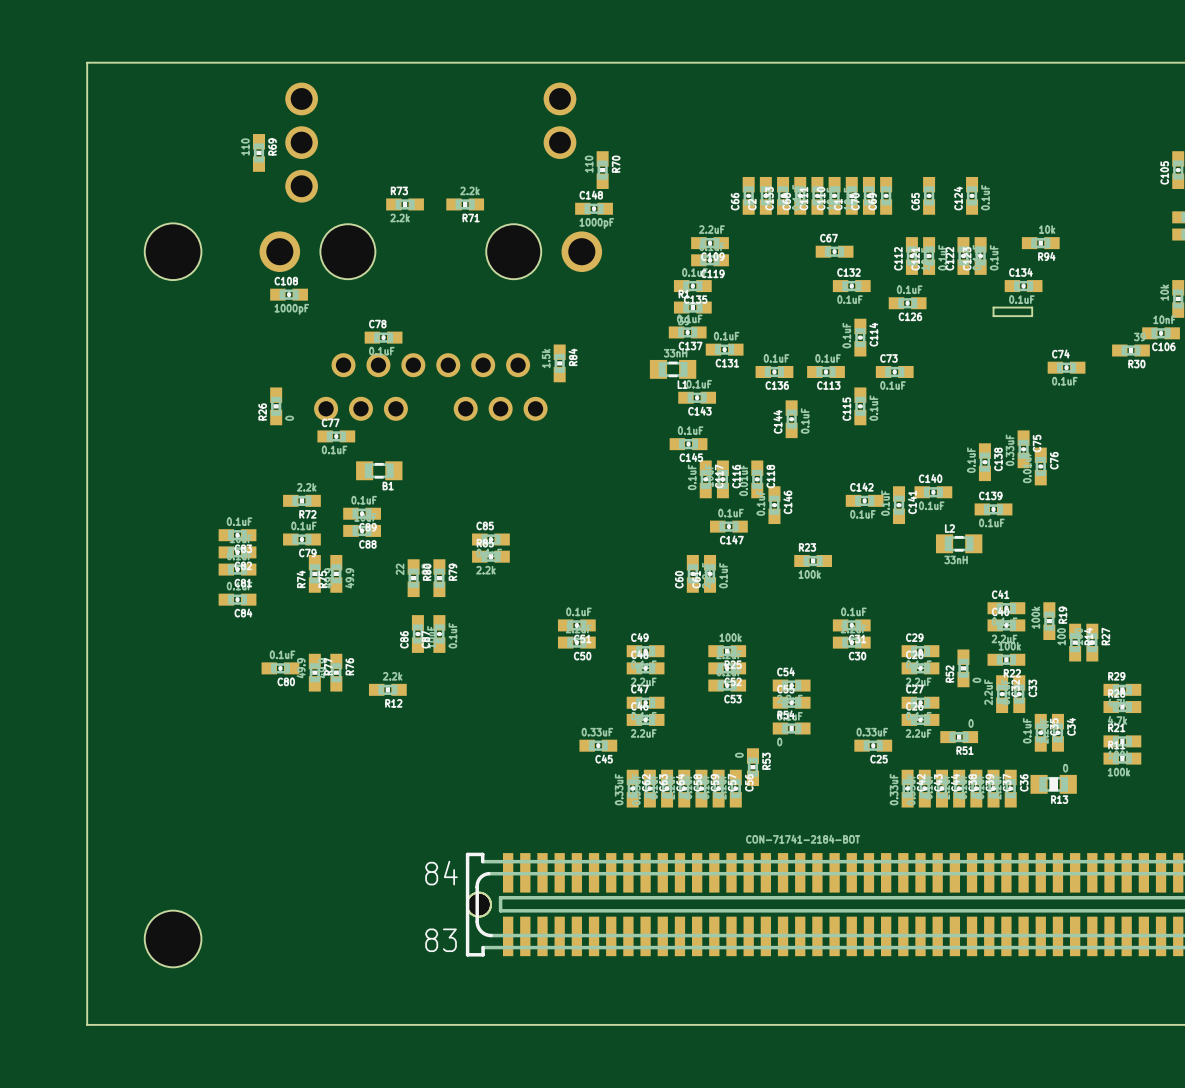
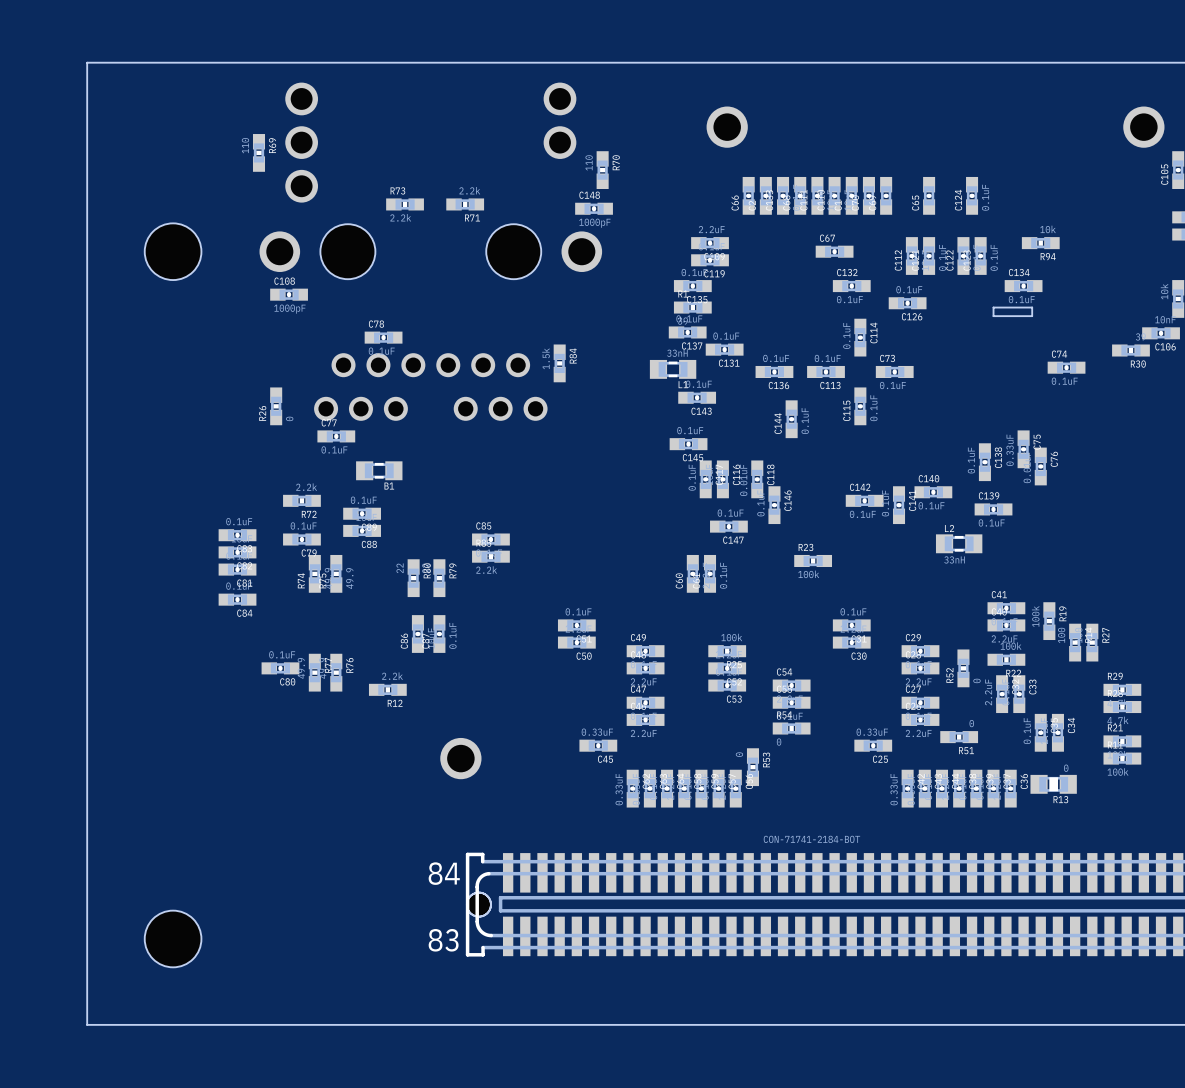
part: none -> (727, 127)
part: none -> (1143, 127)
part: none -> (460, 758)

